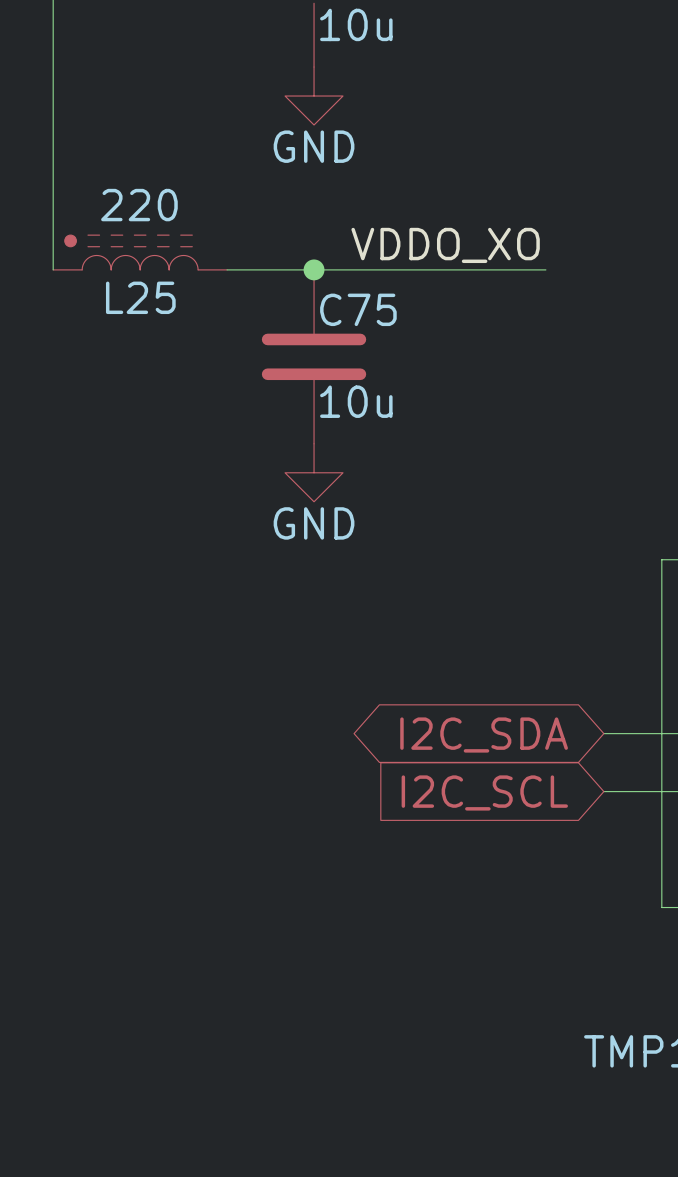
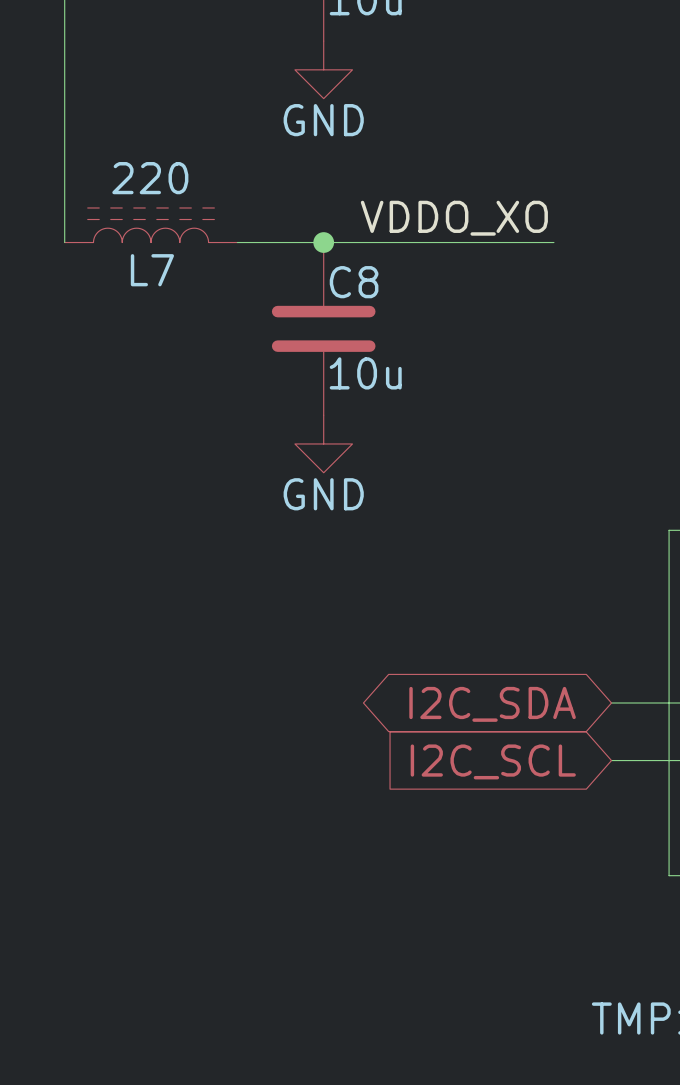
L25: 220 (140, 252) -> none
L7: none -> 220 (151, 225)
C75 name: C75 (358, 309) -> C8 (354, 282)

